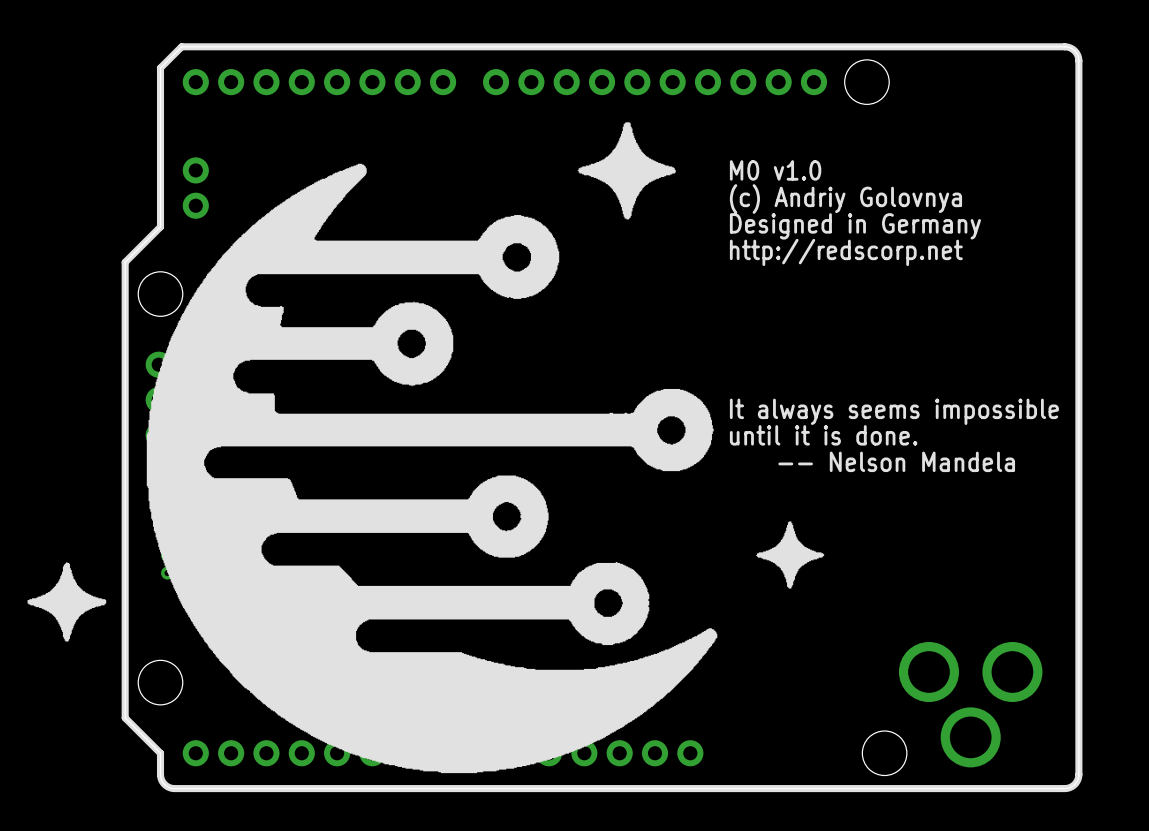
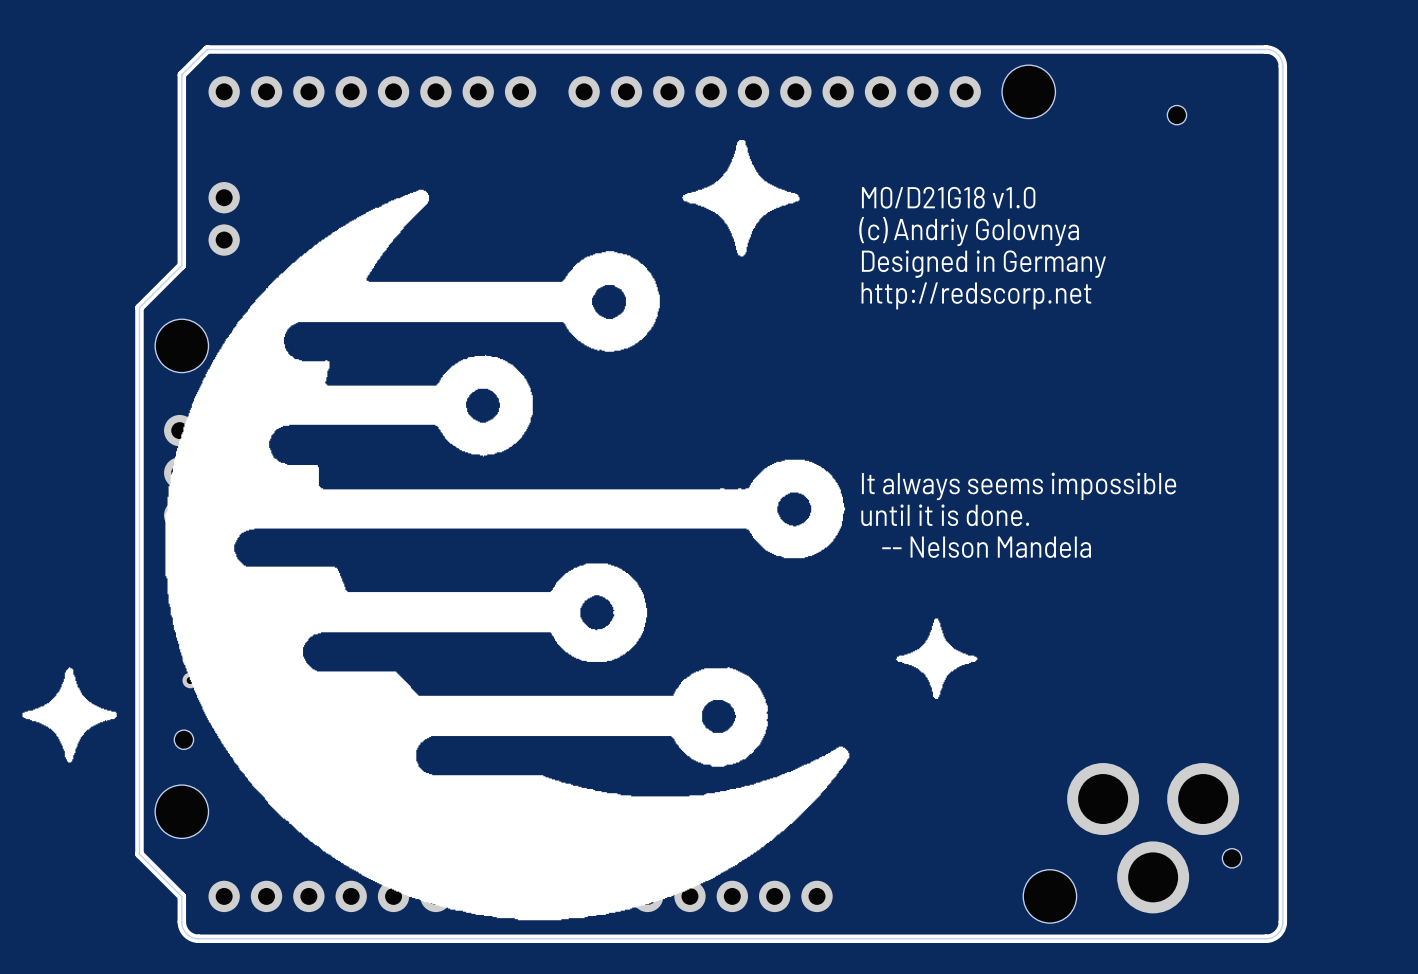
part: none -> (1176, 115)
text: M0 v1.0 (775, 170) -> M0/D21G18 v1.0 (948, 197)
part: none -> (183, 739)
part: none -> (1232, 858)

